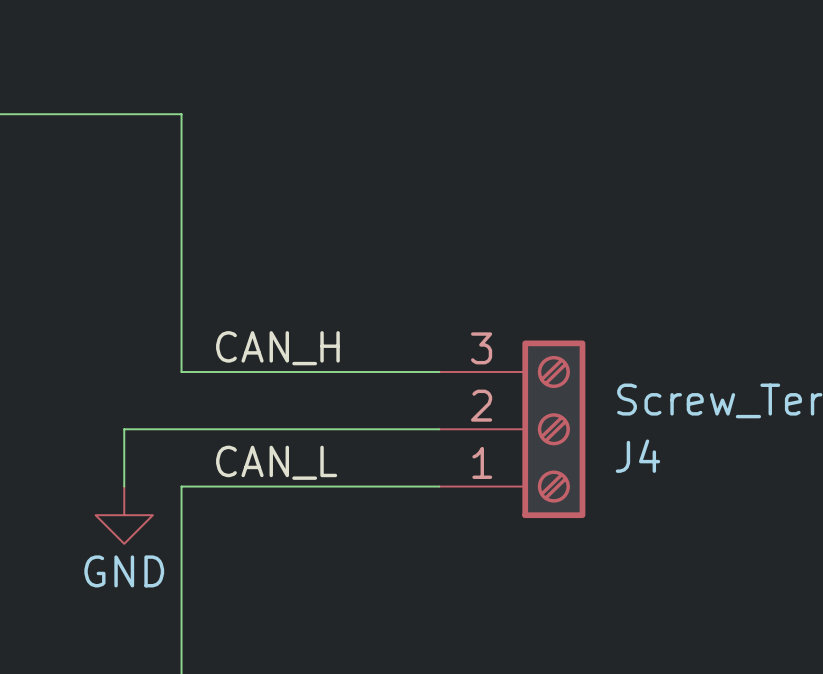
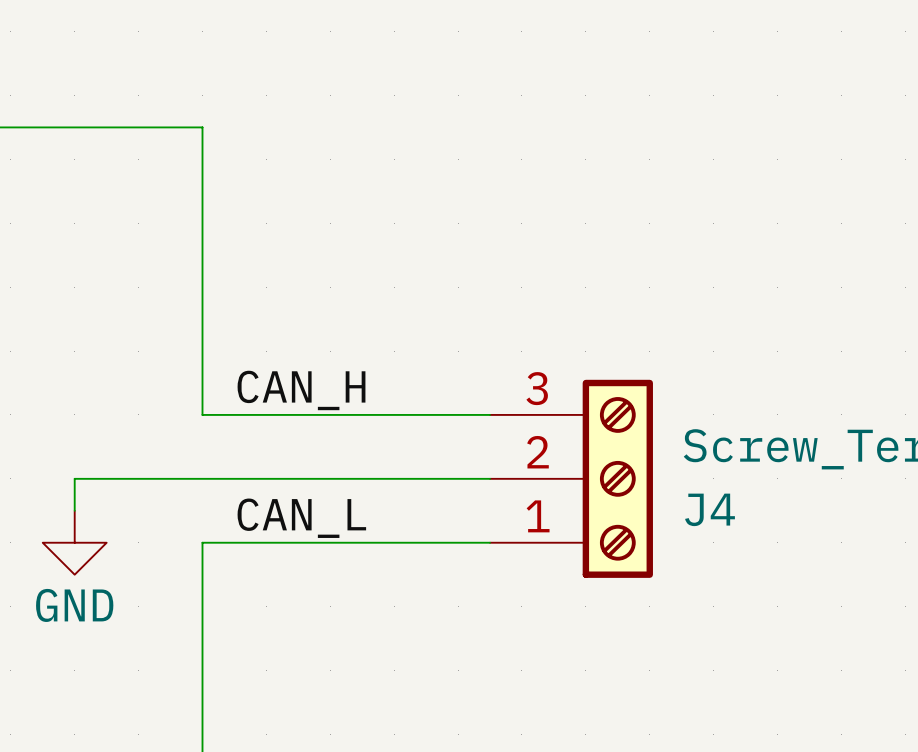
wire: (124, 429) (124, 486) -> (138, 478) (74, 478) (74, 510)
power symbol position: GND (124, 515) -> GND (74, 542)

